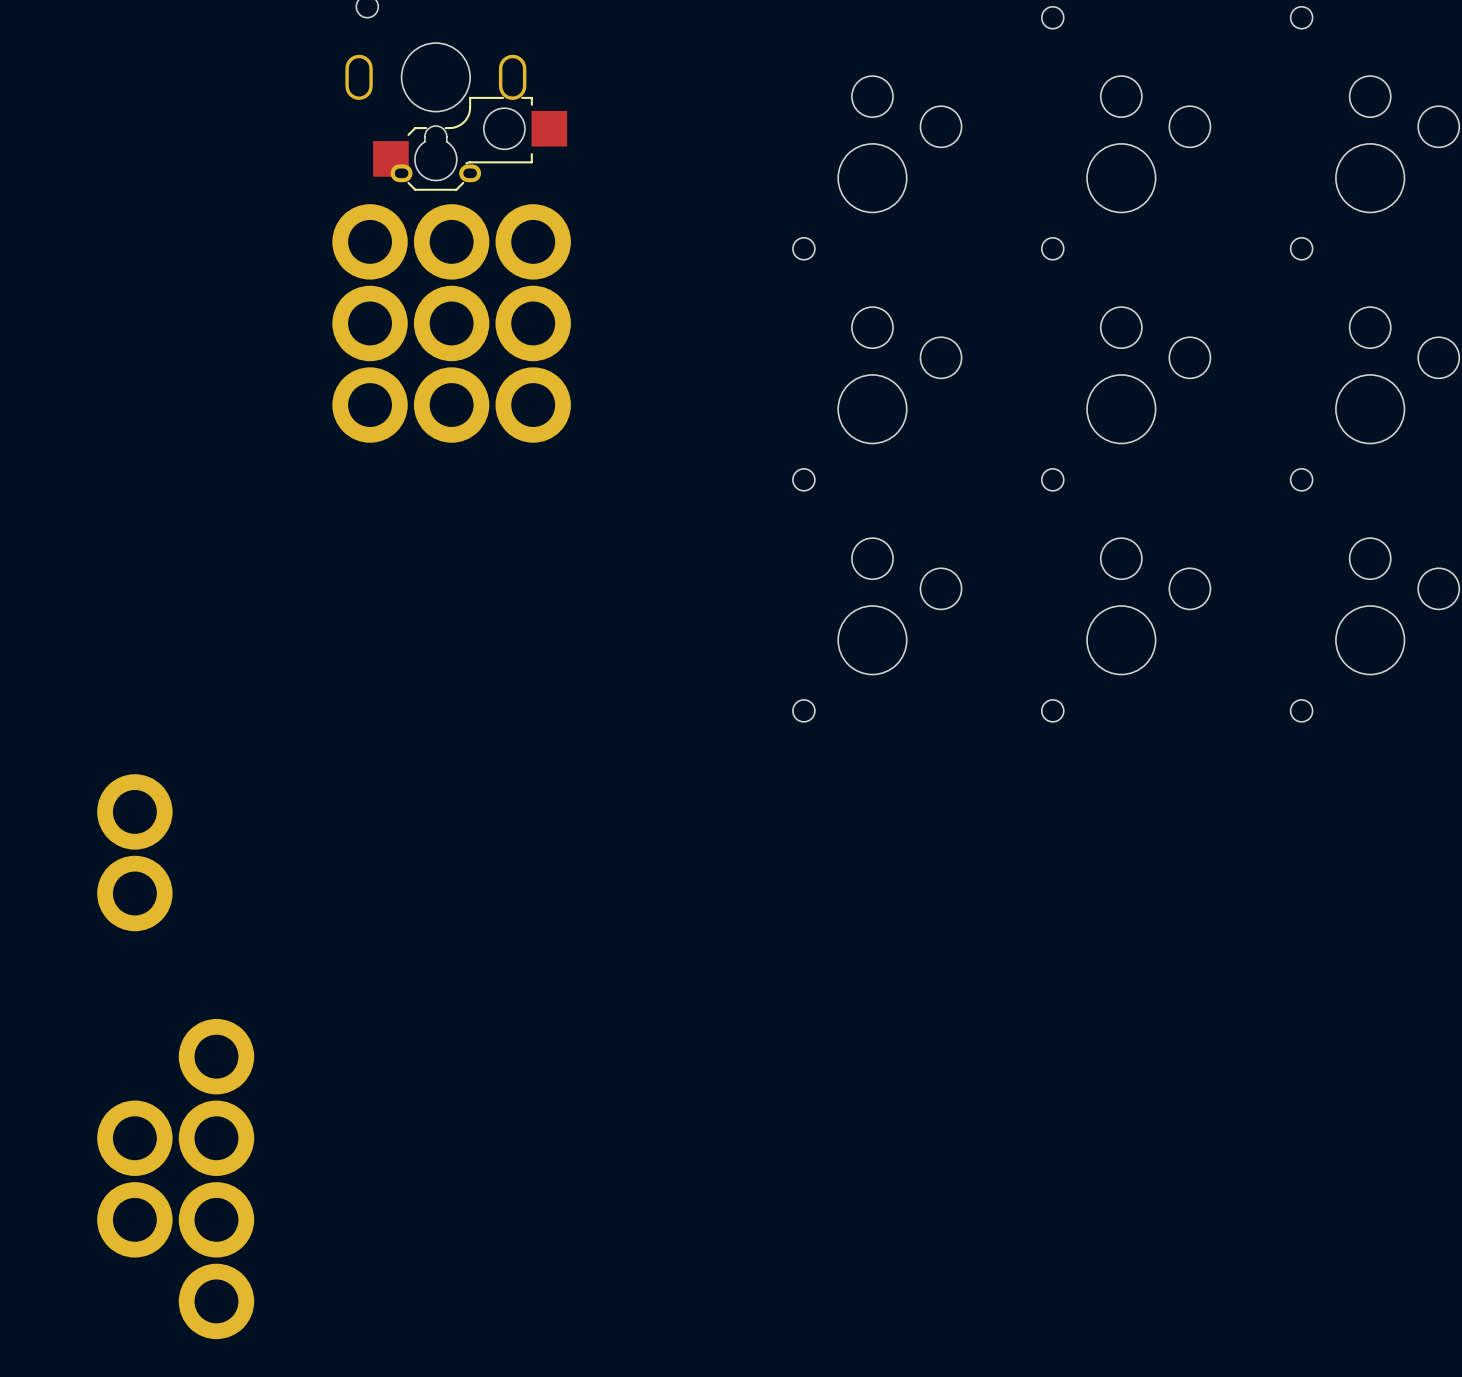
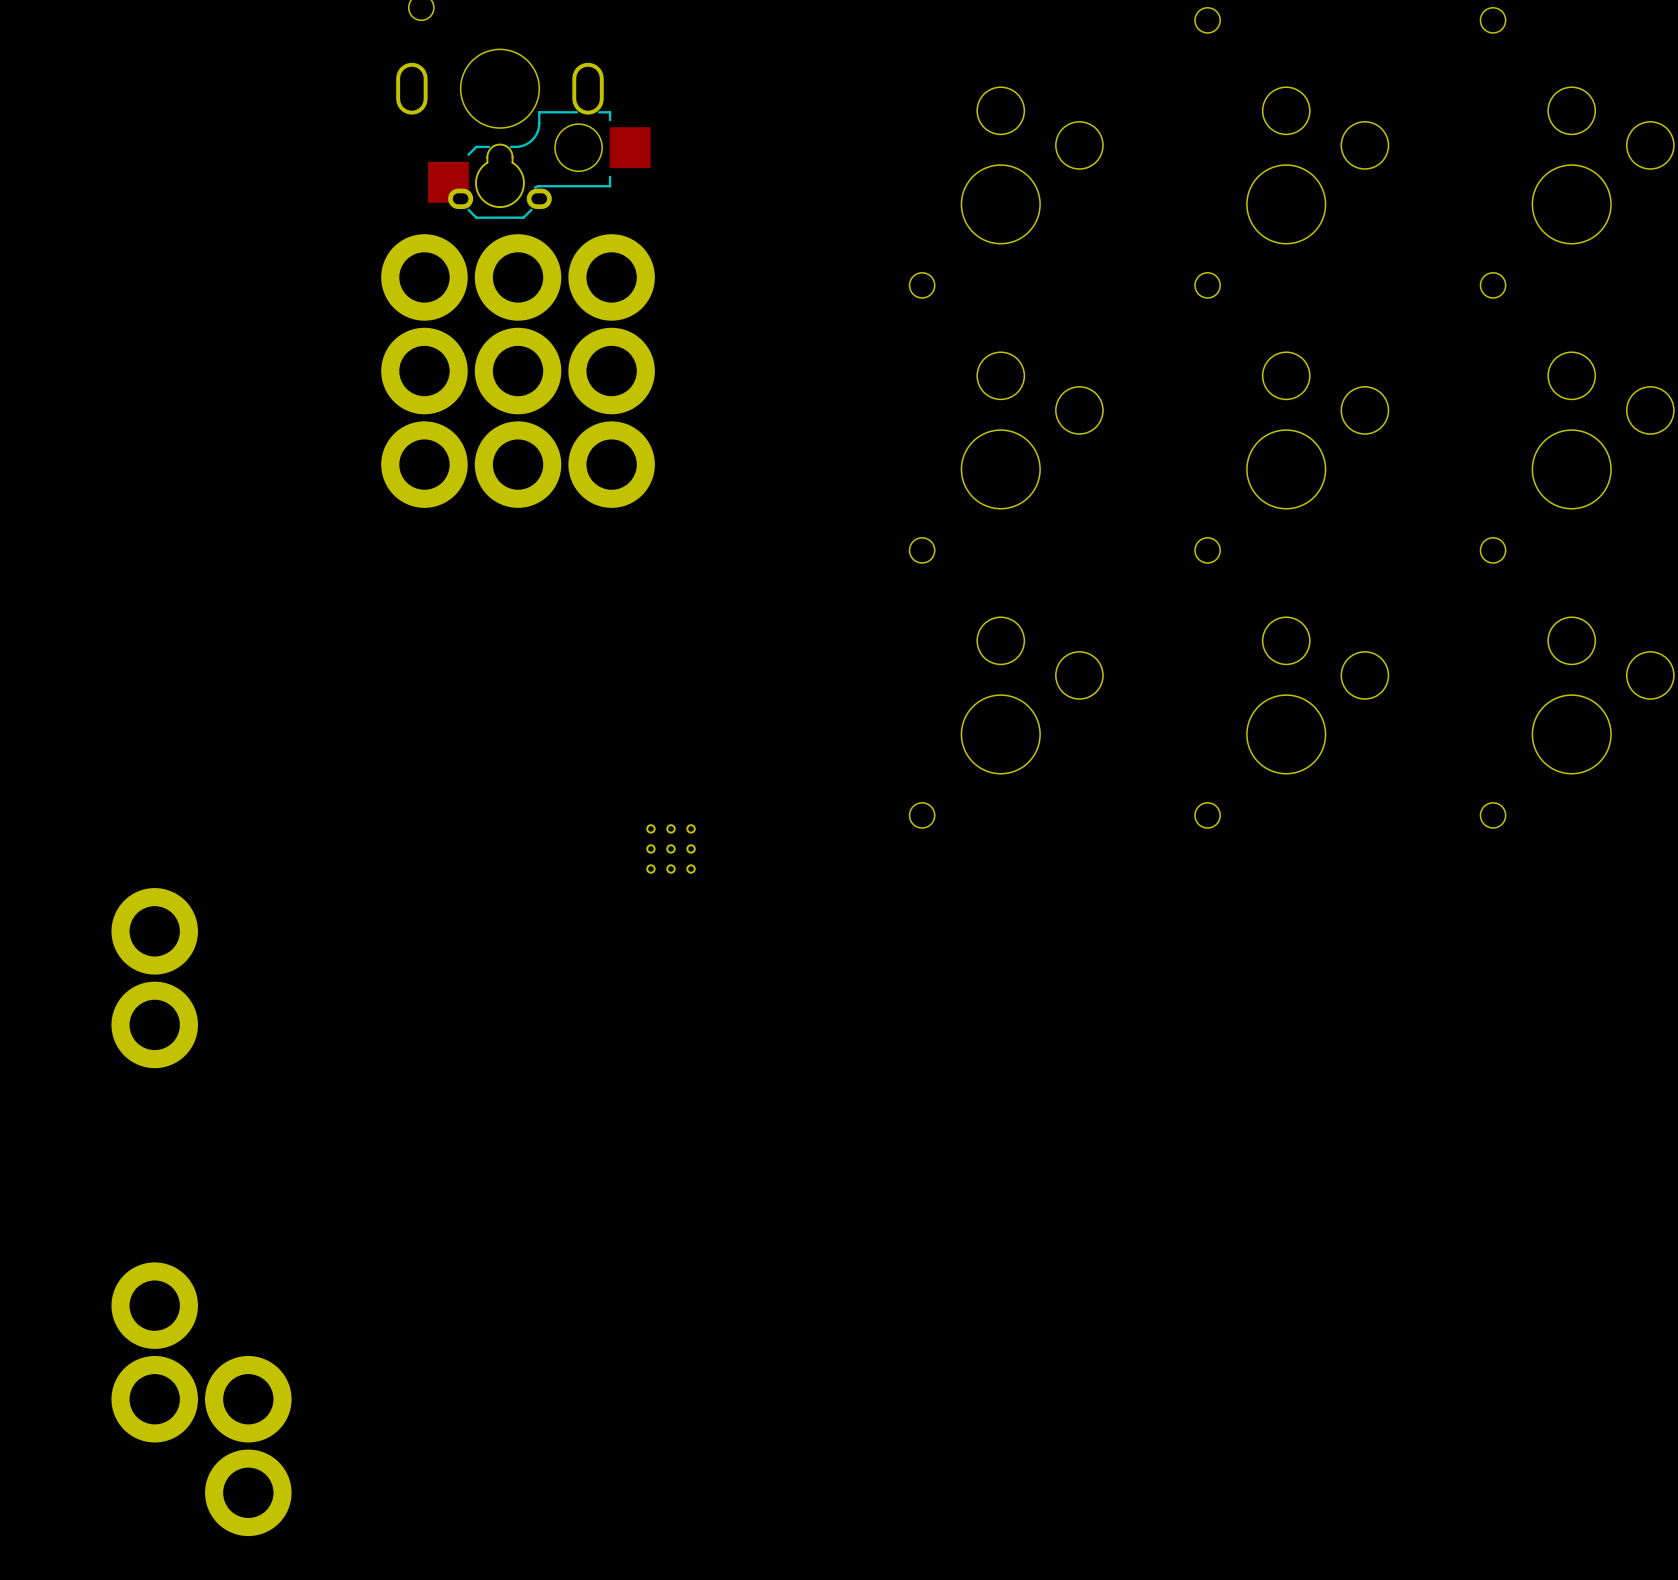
part: none -> (671, 848)
part: (216, 1056) -> none
part: (216, 1138) -> none

